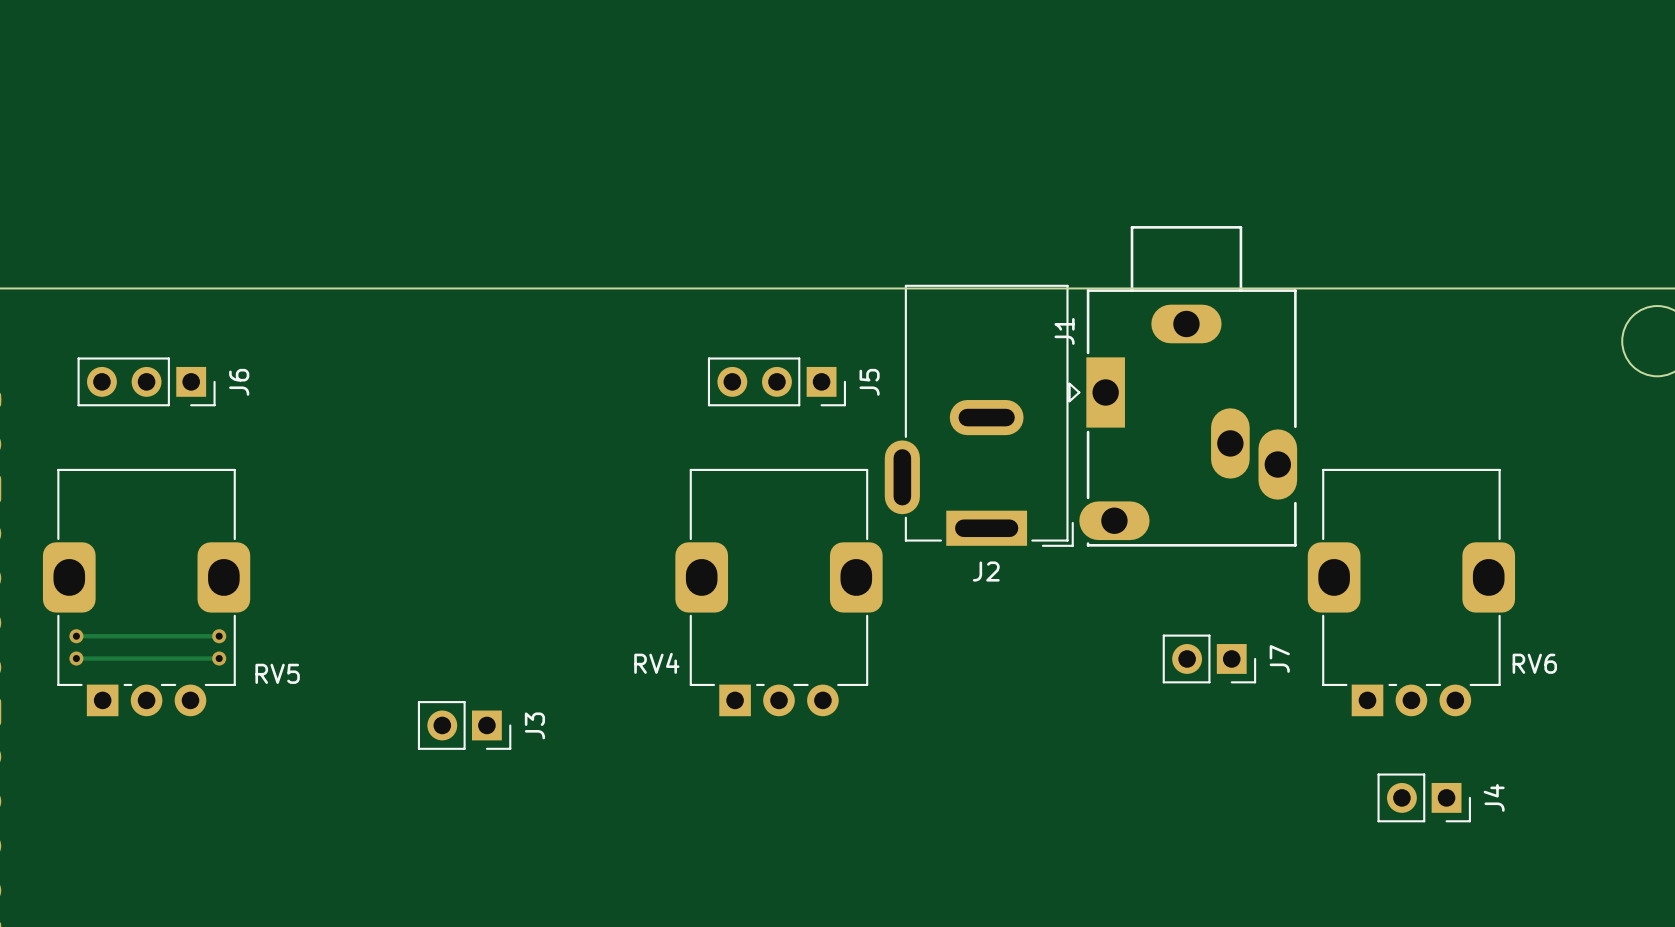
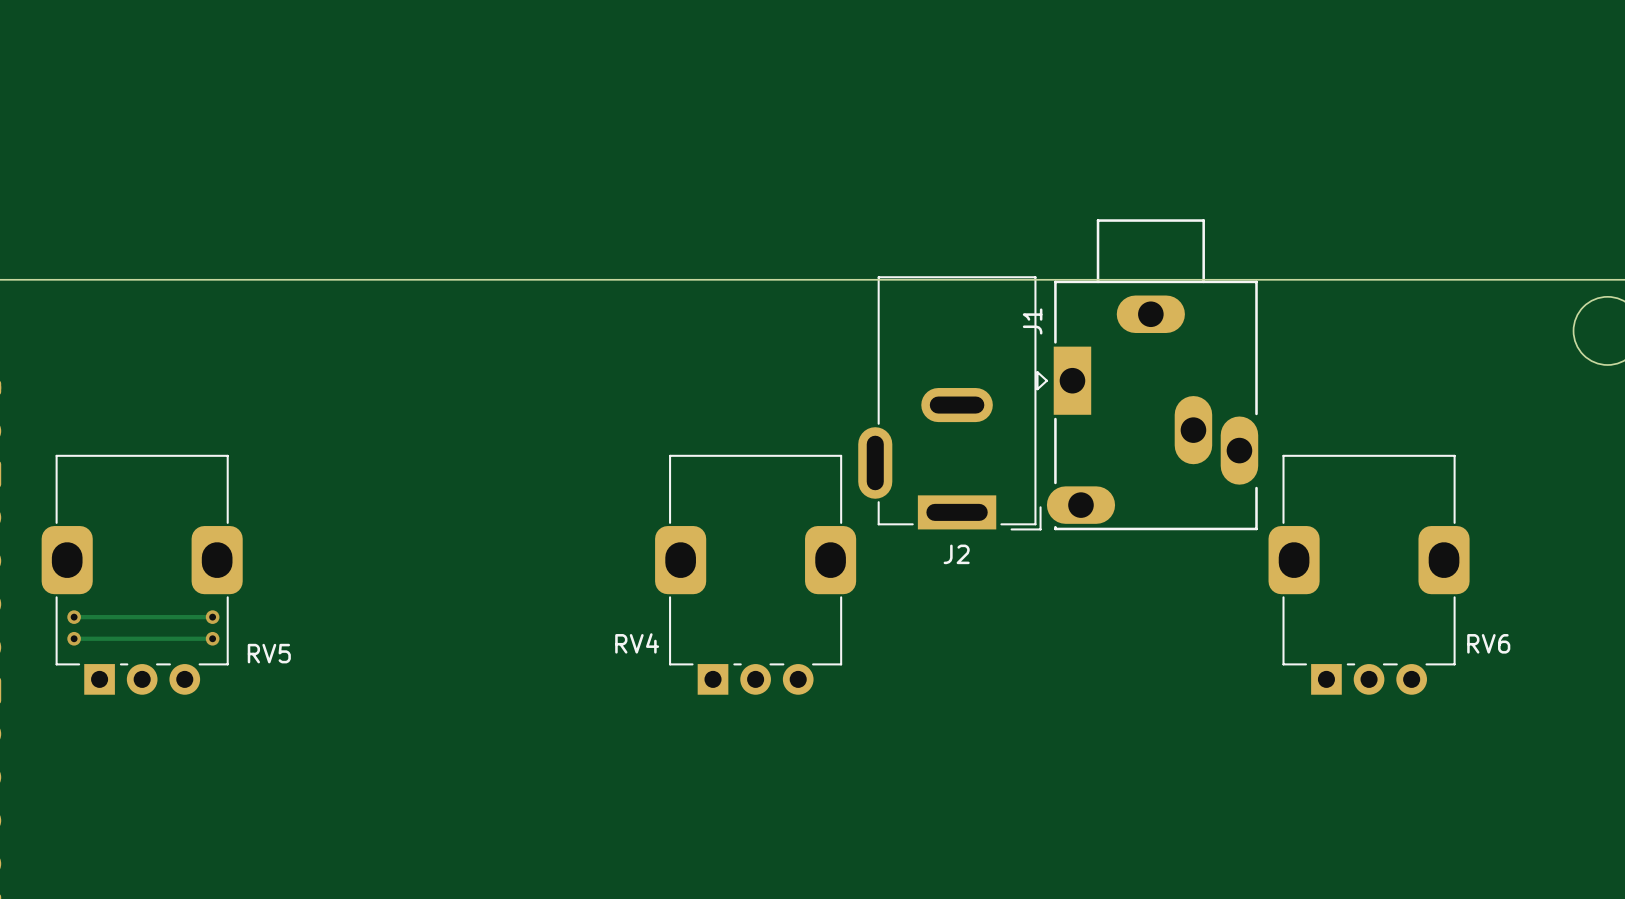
J6: (146, 381) -> none
J5: (776, 381) -> none
J7: (1209, 658) -> none
J3: (464, 725) -> none
J4: (1424, 797) -> none

